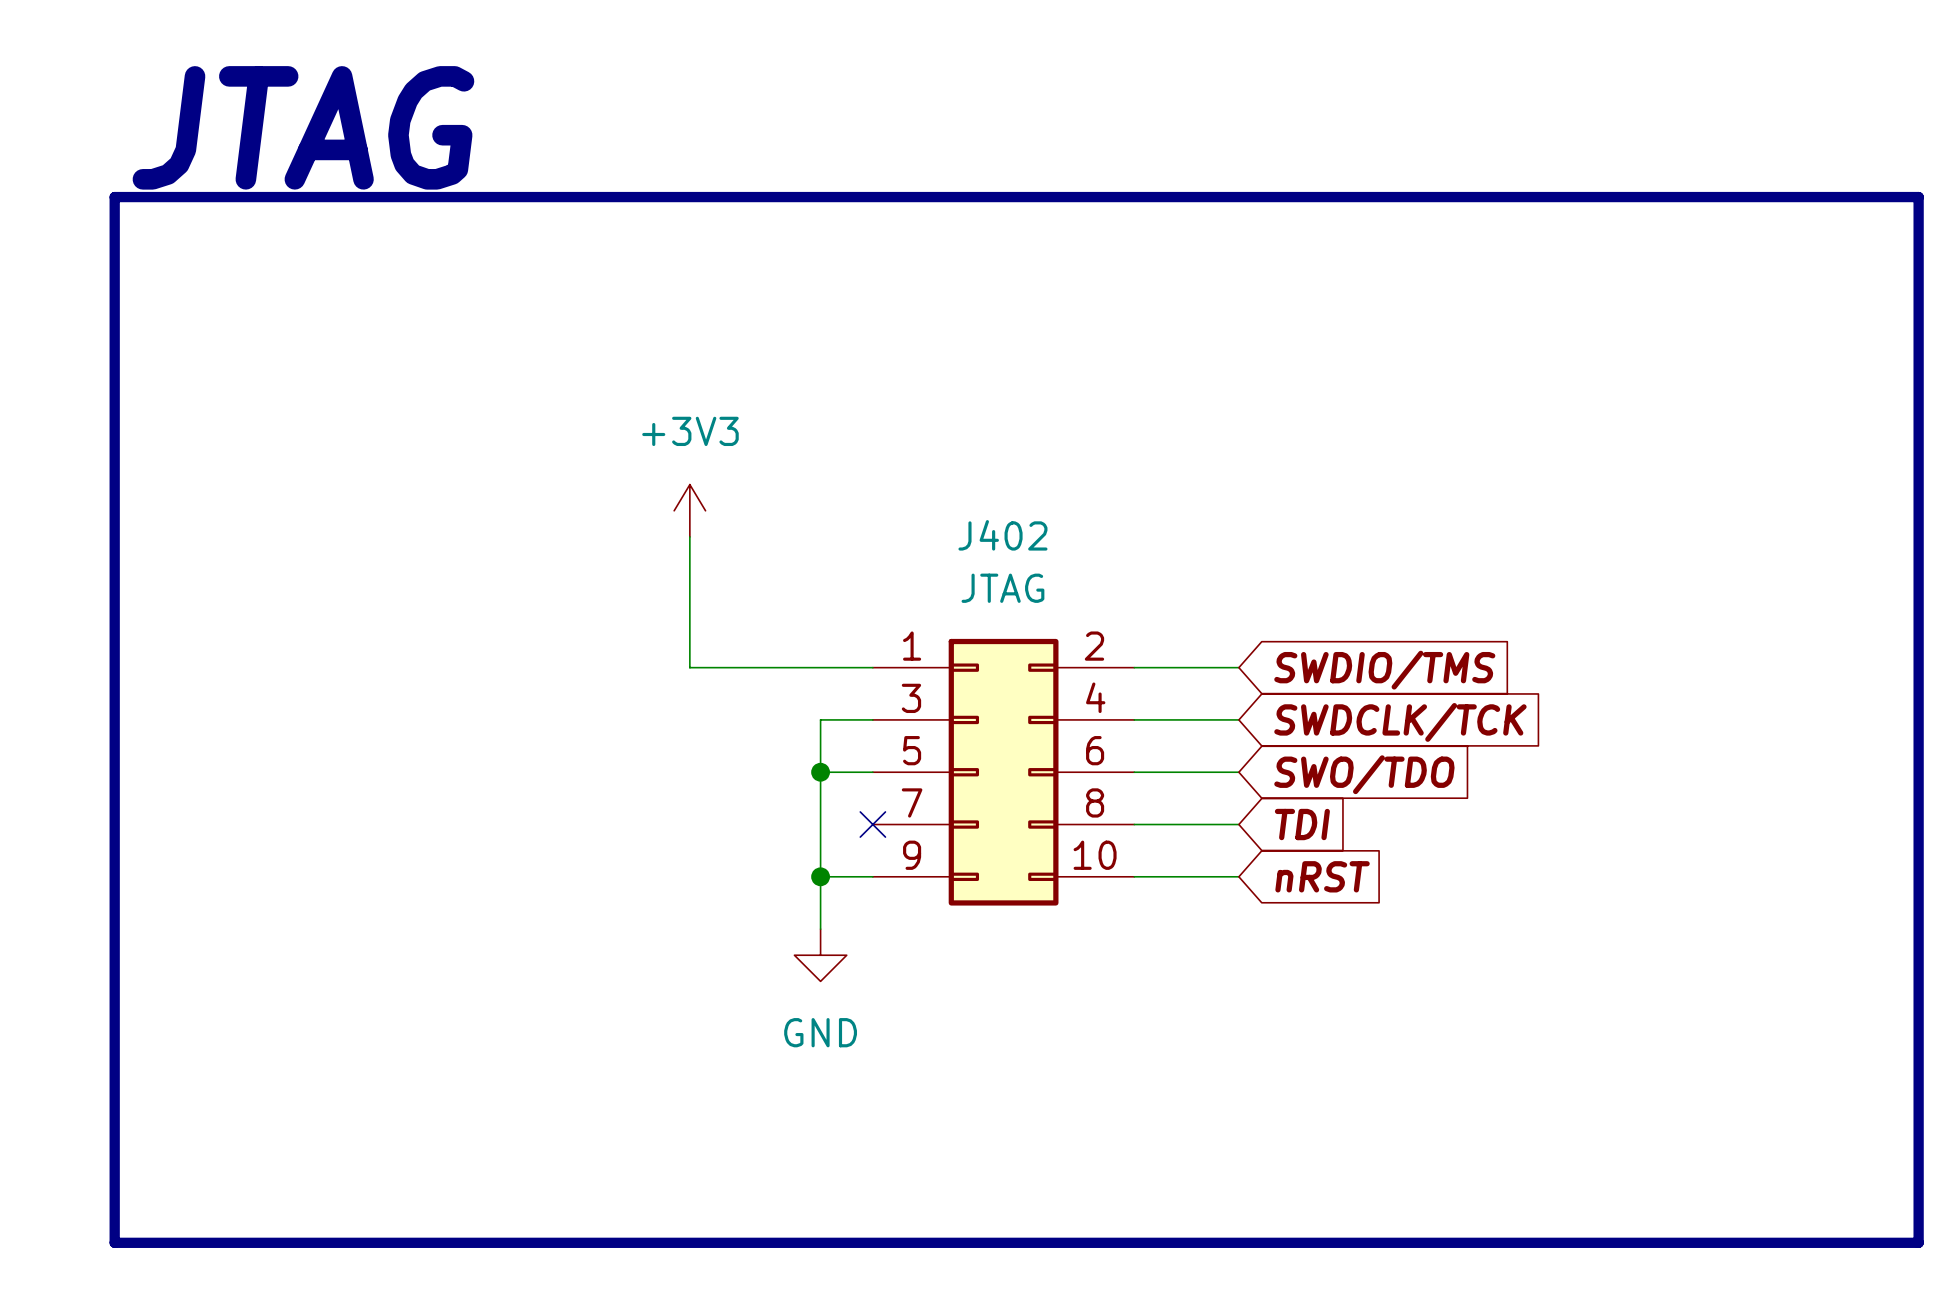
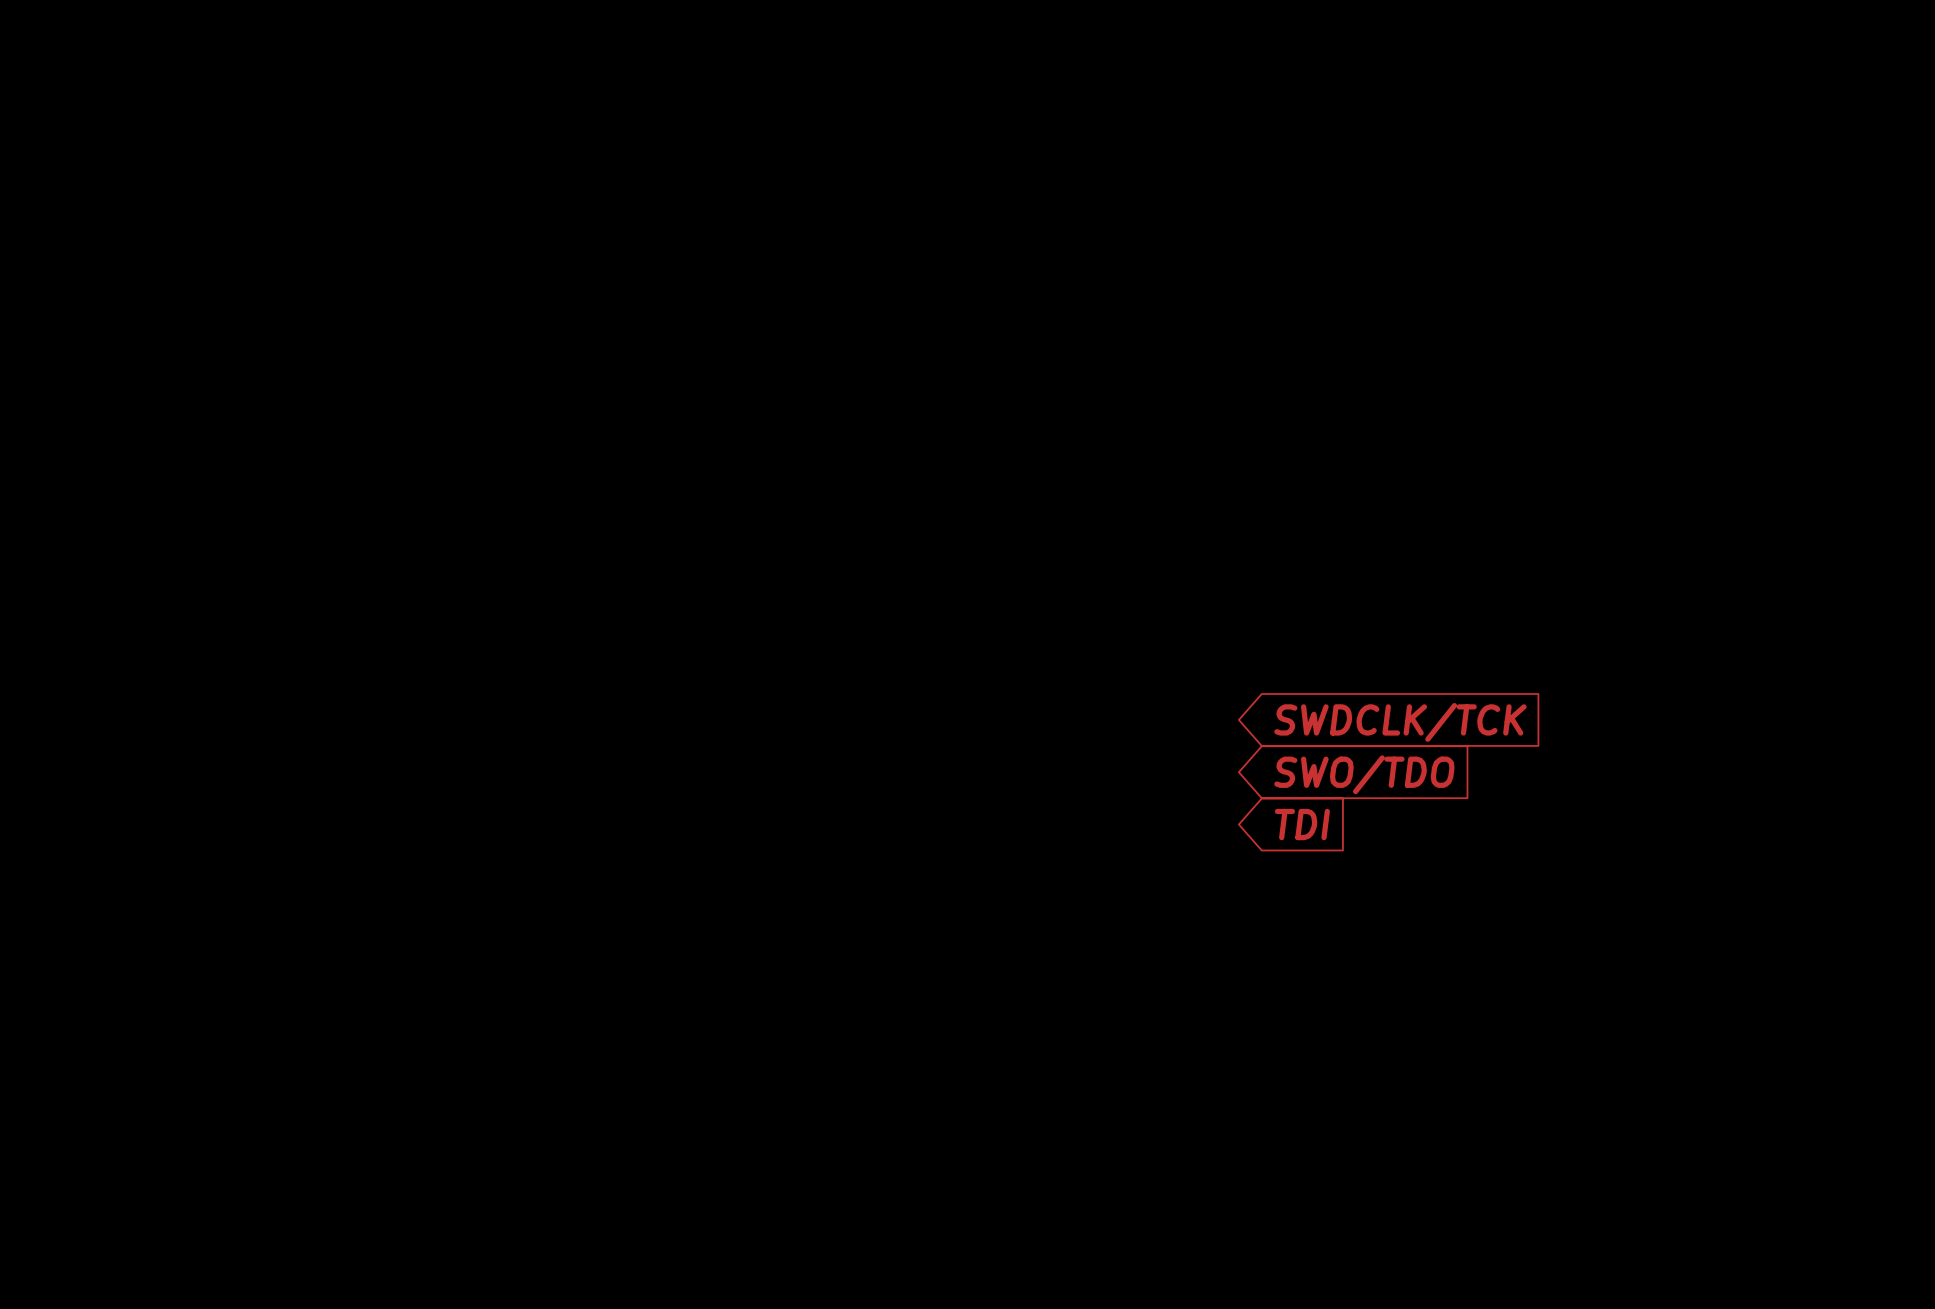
text: JTAG (303, 127) -> none
line: (114, 197) (1918, 197) (1918, 1242) (114, 1242) (114, 197) -> none
power symbol: +3V3 (689, 510) -> none
wire: (689, 536) (689, 667) (872, 667) -> none
wire: (1134, 667) (1238, 667) -> none
global label: SWDIO/TMS (1384, 670) -> none
wire: (872, 719) (820, 719) (820, 929) -> none
wire: (1134, 719) (1238, 719) -> none
wire: (820, 772) (872, 772) -> none
junction: (820, 772) -> none
J402: JTAG (1003, 772) -> none
wire: (1134, 772) (1238, 772) -> none
no-connect mark: (872, 824) -> none
wire: (1134, 824) (1238, 824) -> none
wire: (820, 876) (872, 876) -> none
junction: (820, 876) -> none
wire: (1134, 876) (1238, 876) -> none
global label: nRST (1322, 876) -> none
power symbol: GND (820, 955) -> none

